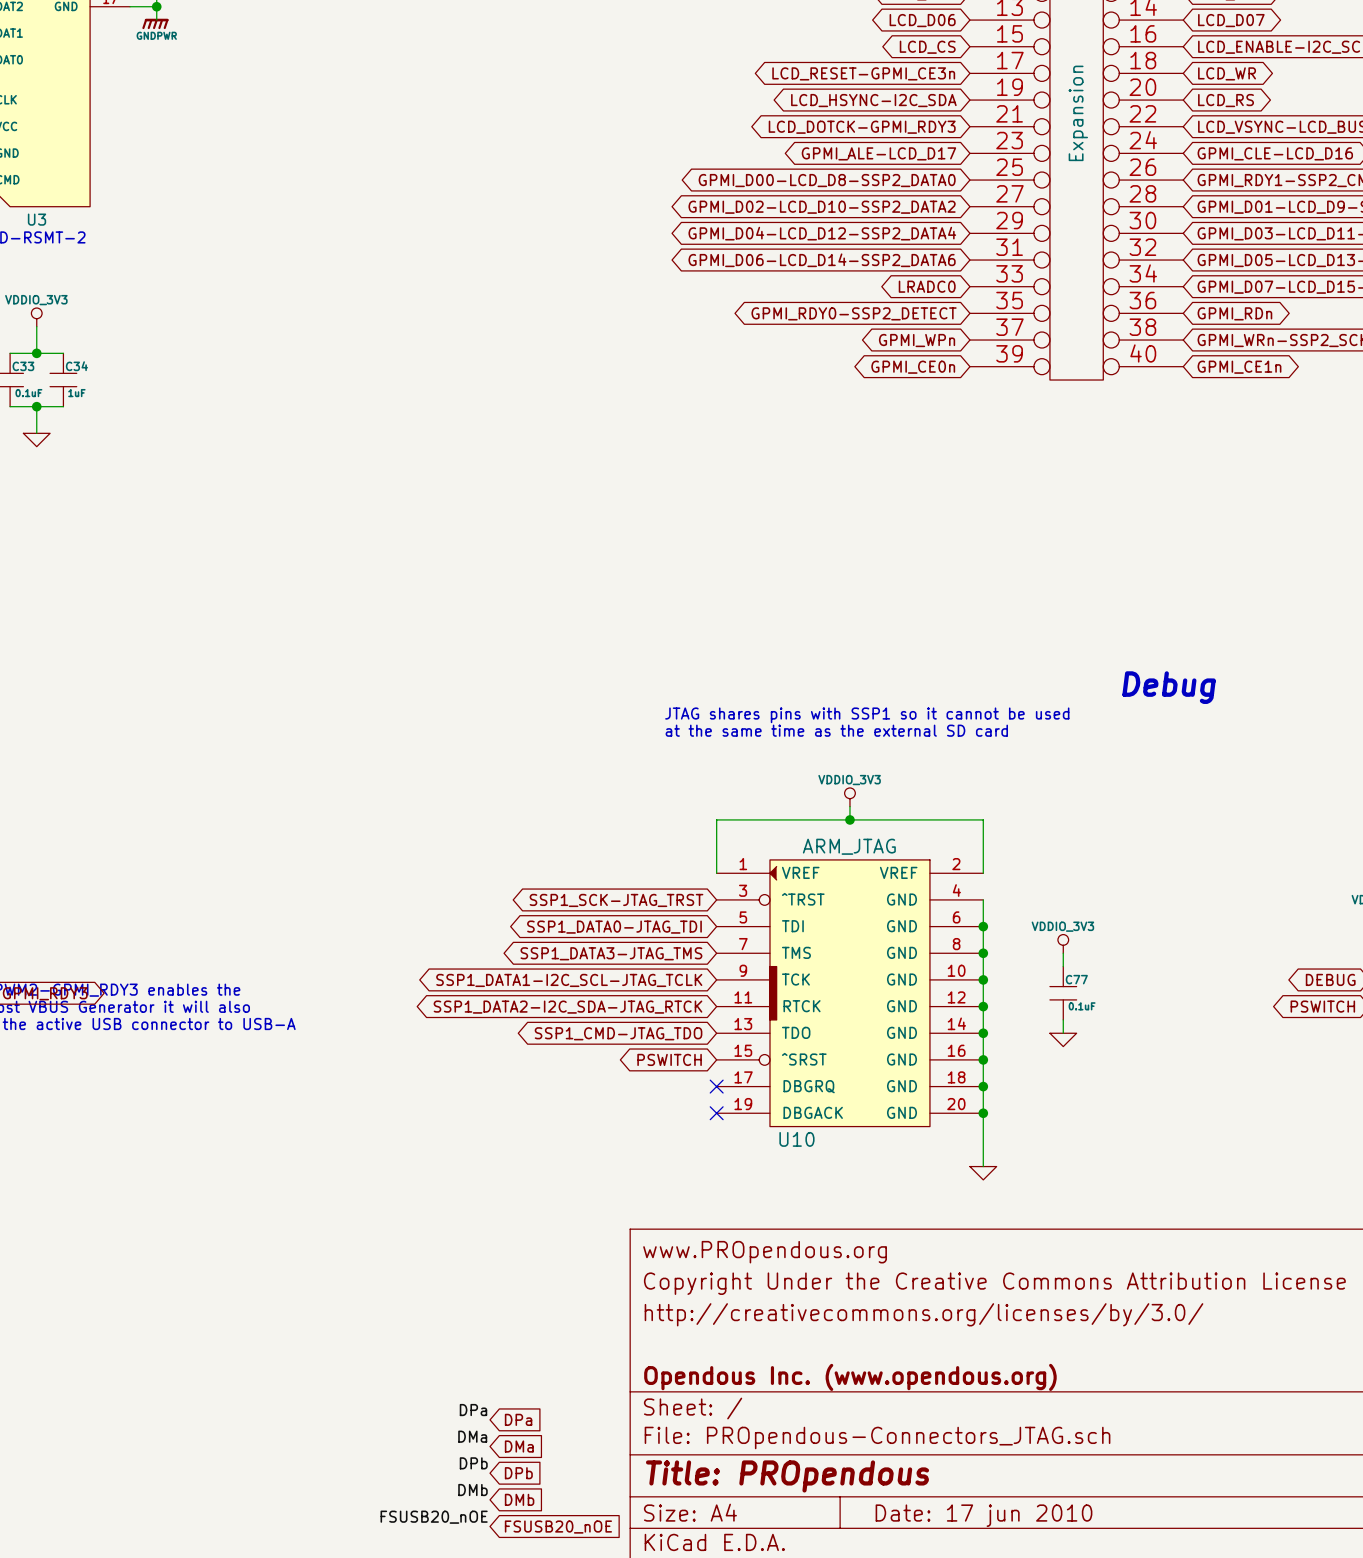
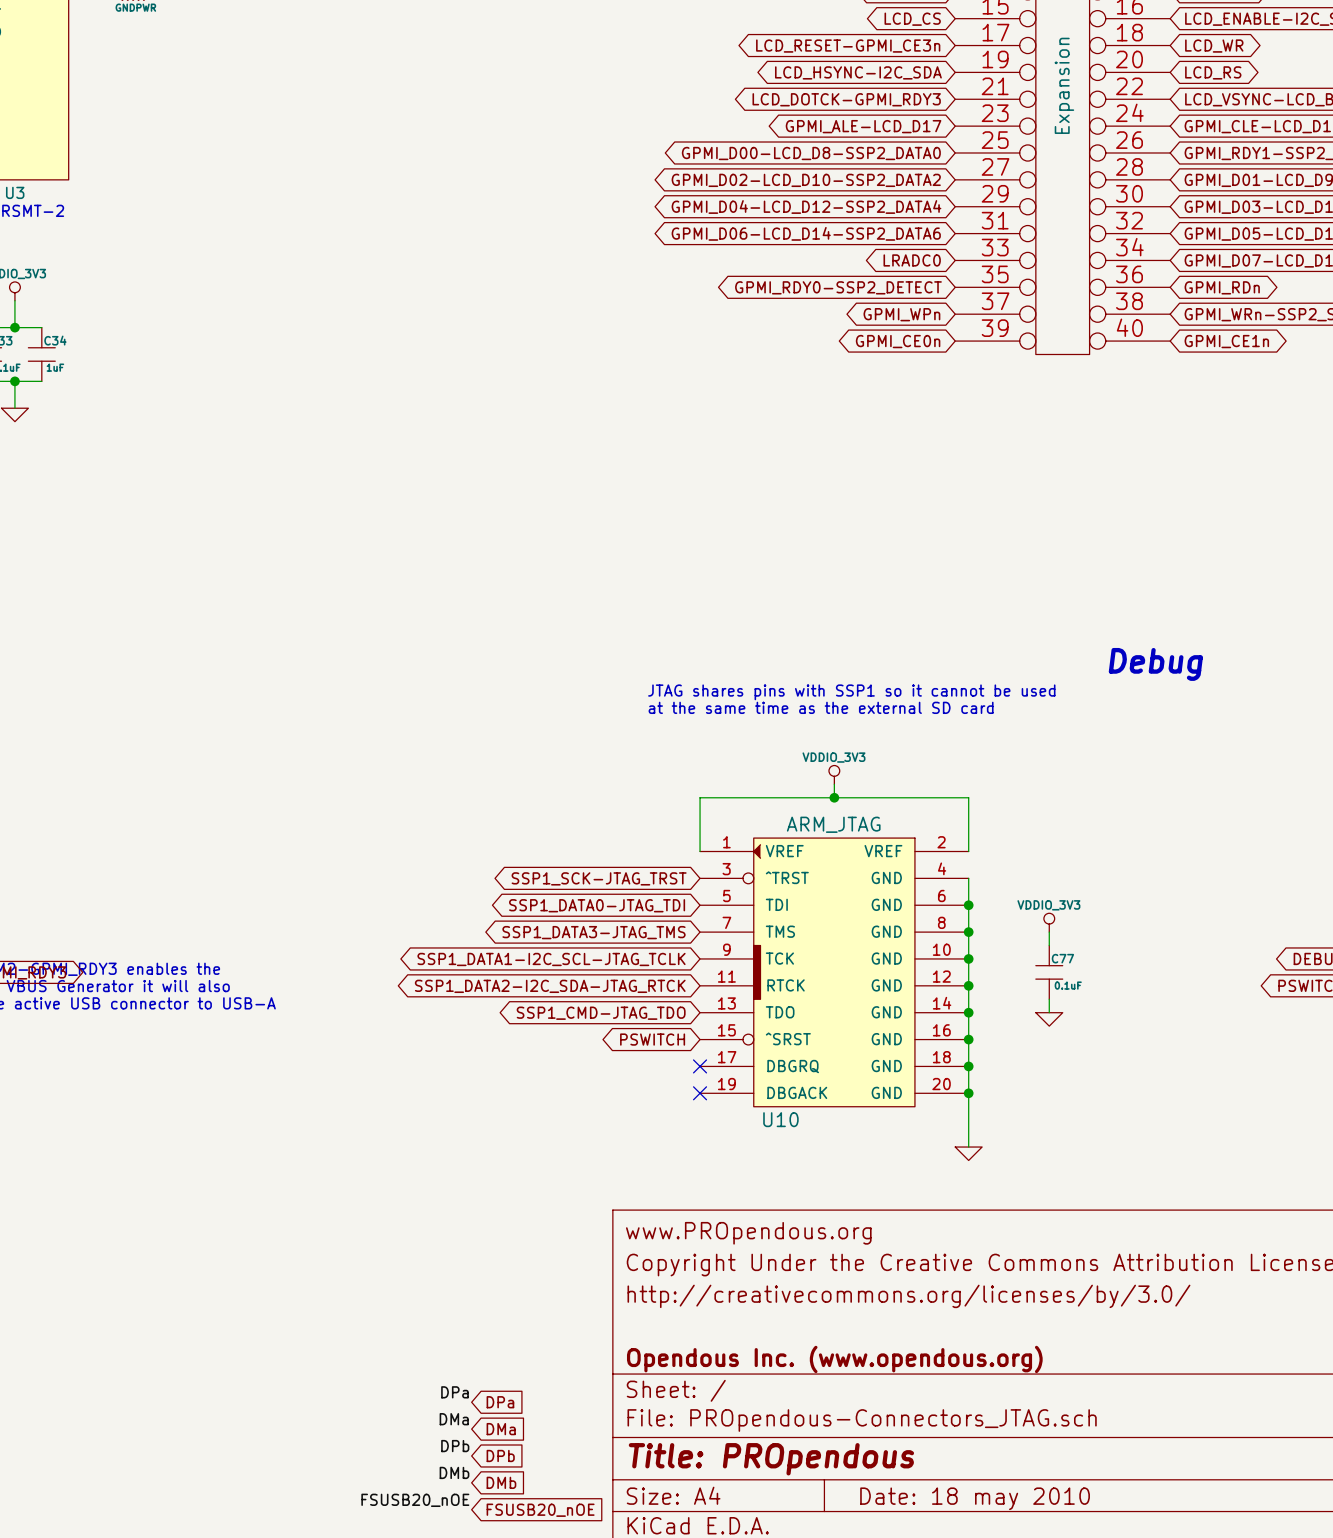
title block: Date: 17 jun 2010 (984, 1515) -> Date: 18 may 2010 (975, 1498)

